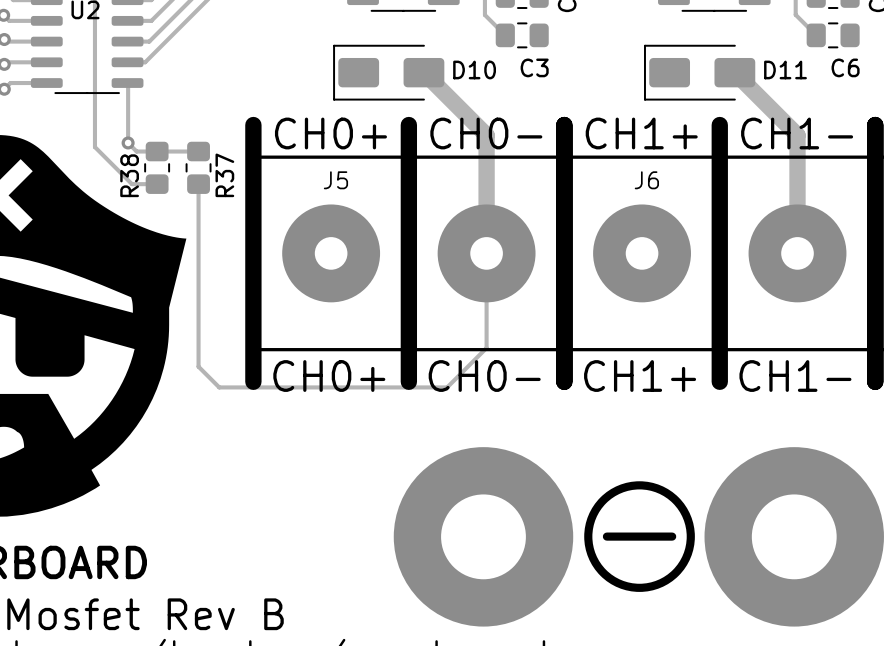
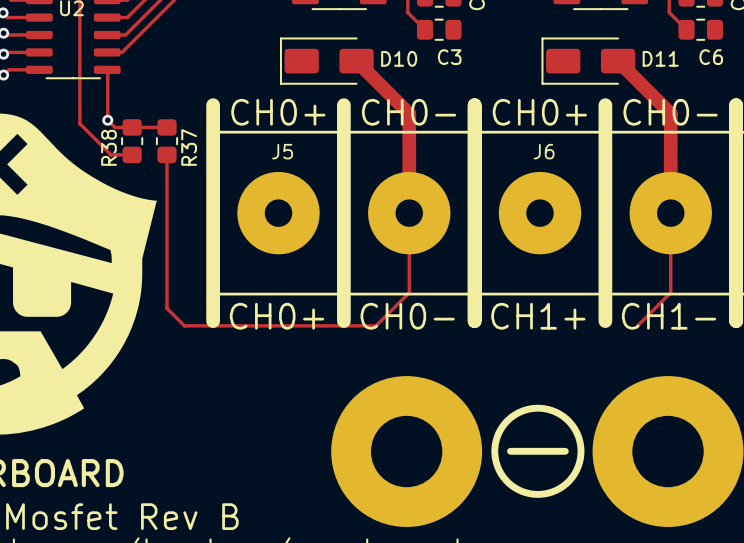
text: CH1+ (641, 133) -> CH0+ (539, 112)
text: CH1- (797, 133) -> CH0- (670, 112)
track: none -> (670, 213) (670, 292) (637, 325)

